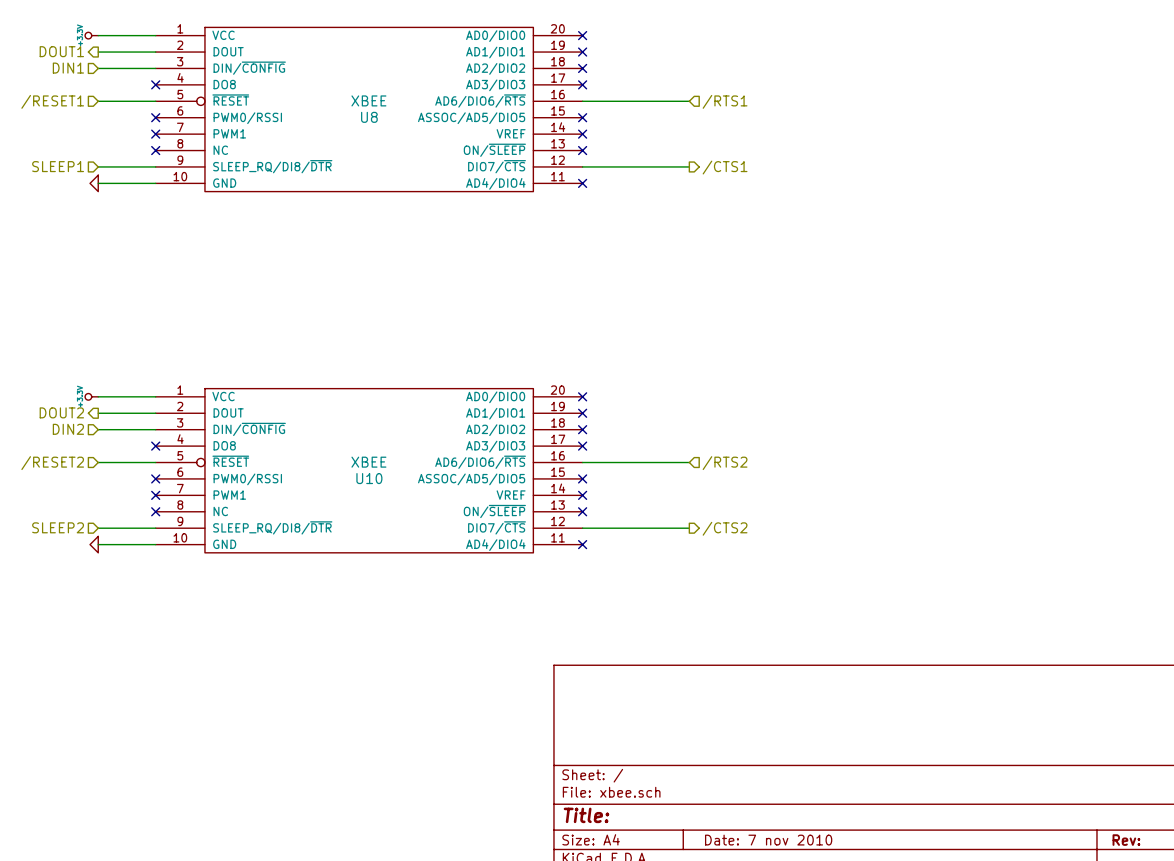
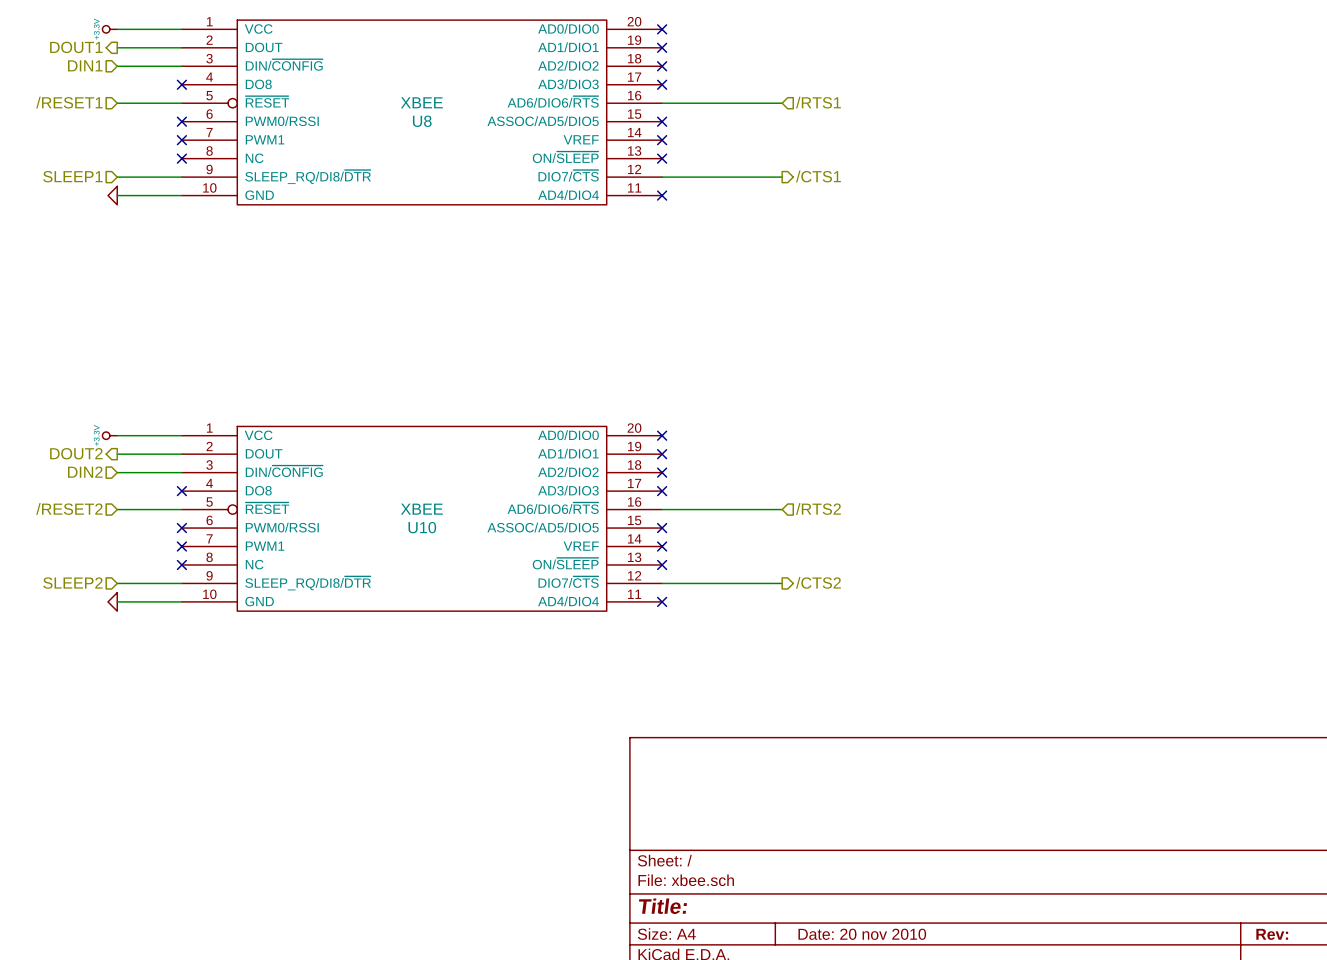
title block: Date: 7 nov 2010 (768, 840) -> Date: 20 nov 2010 (862, 934)

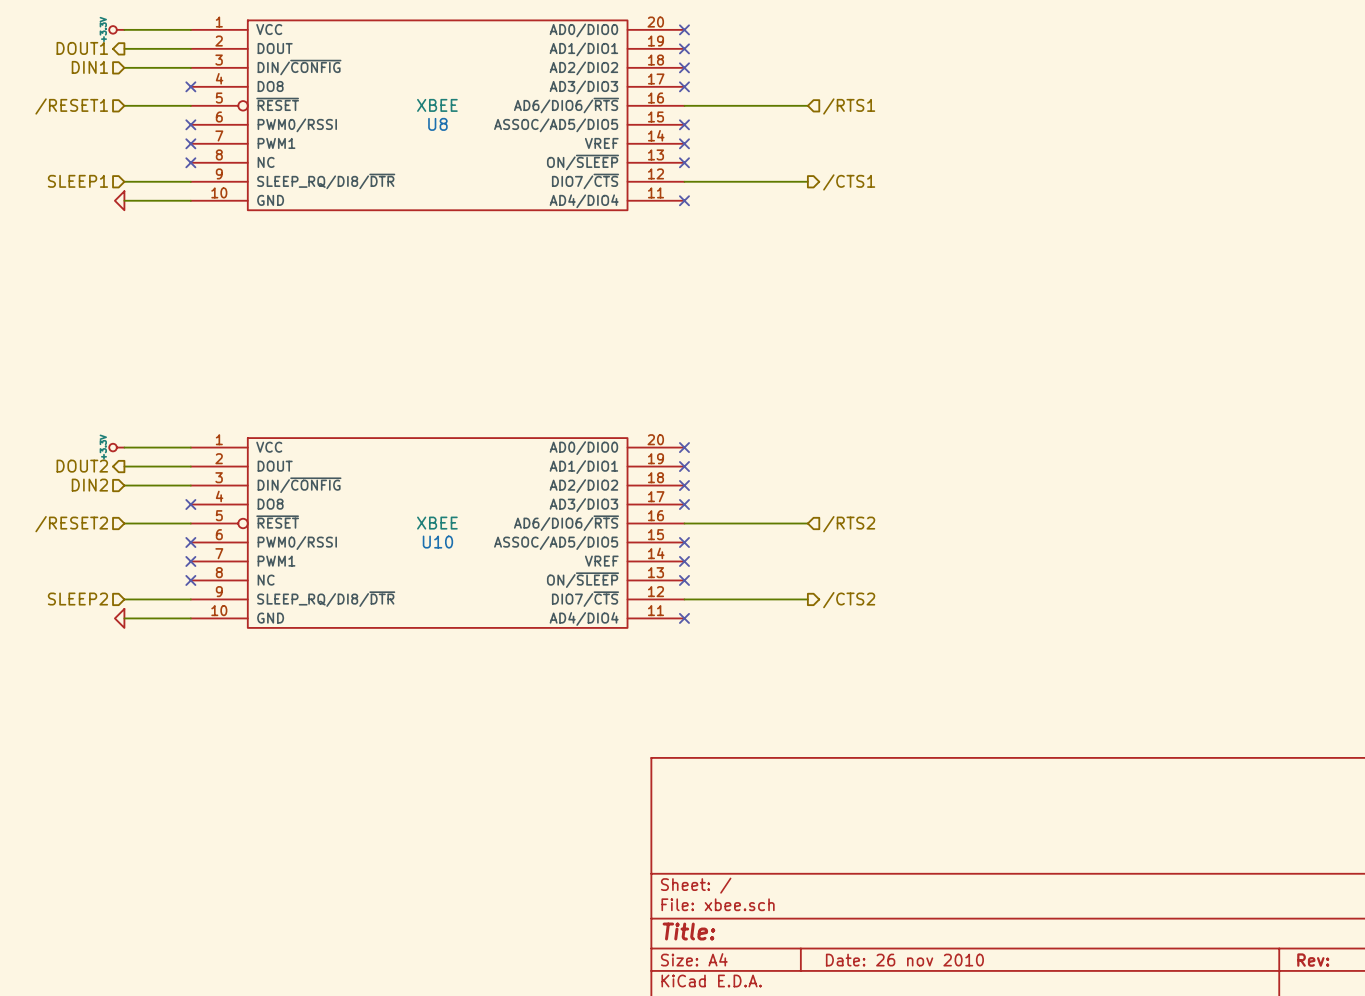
title block: Date: 20 nov 2010 (862, 934) -> Date: 26 nov 2010 (904, 960)

